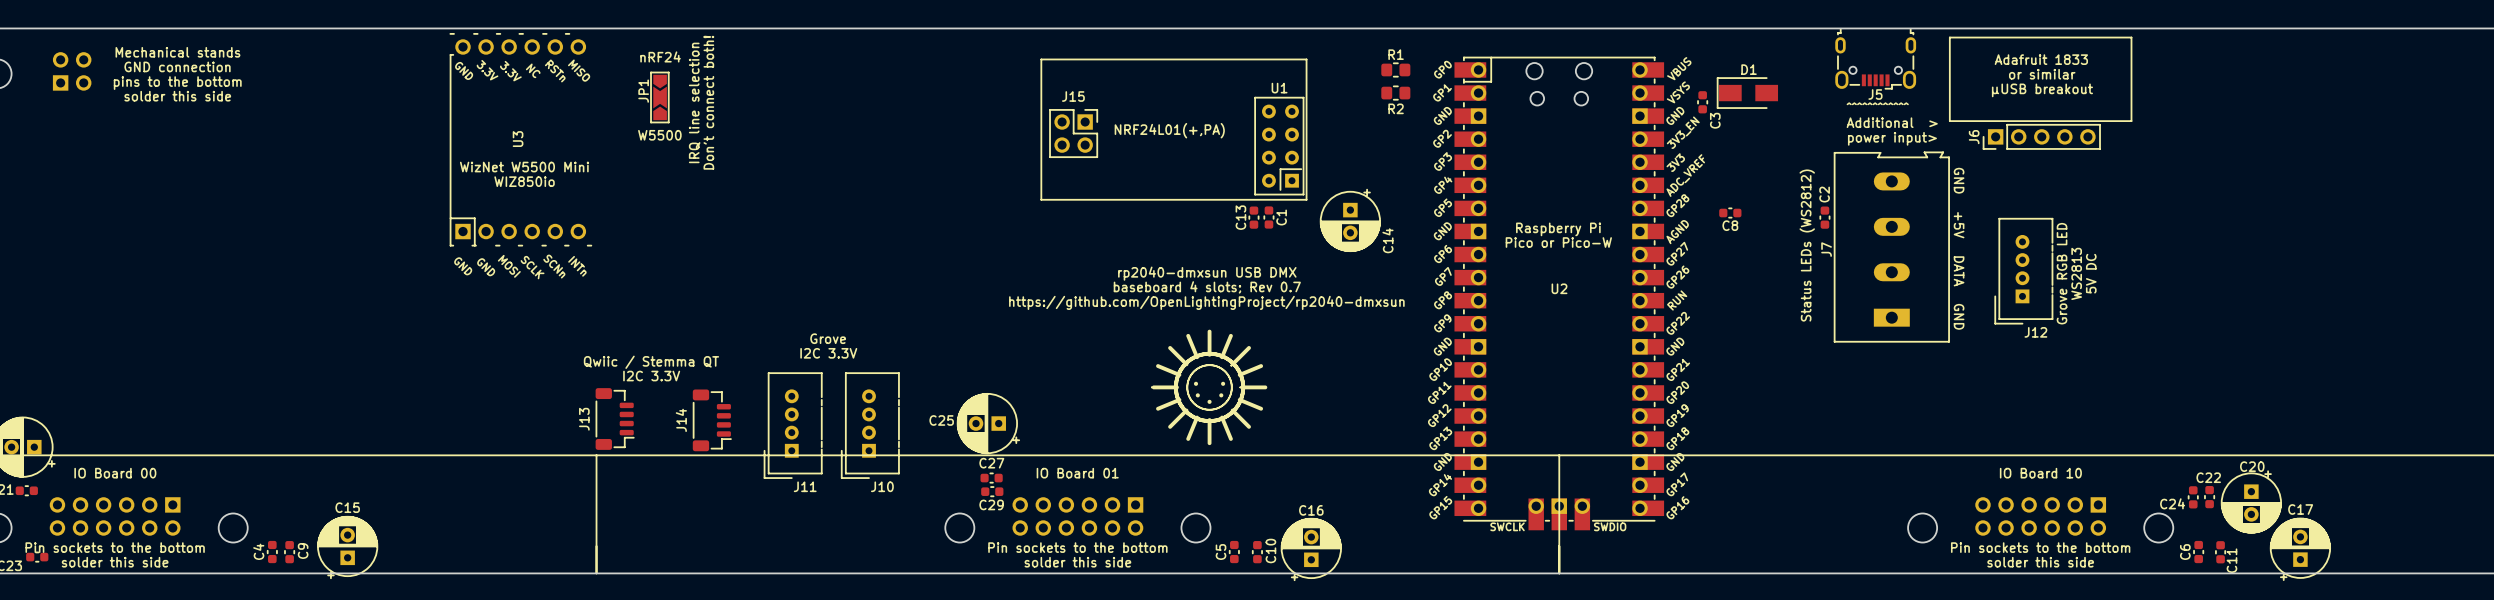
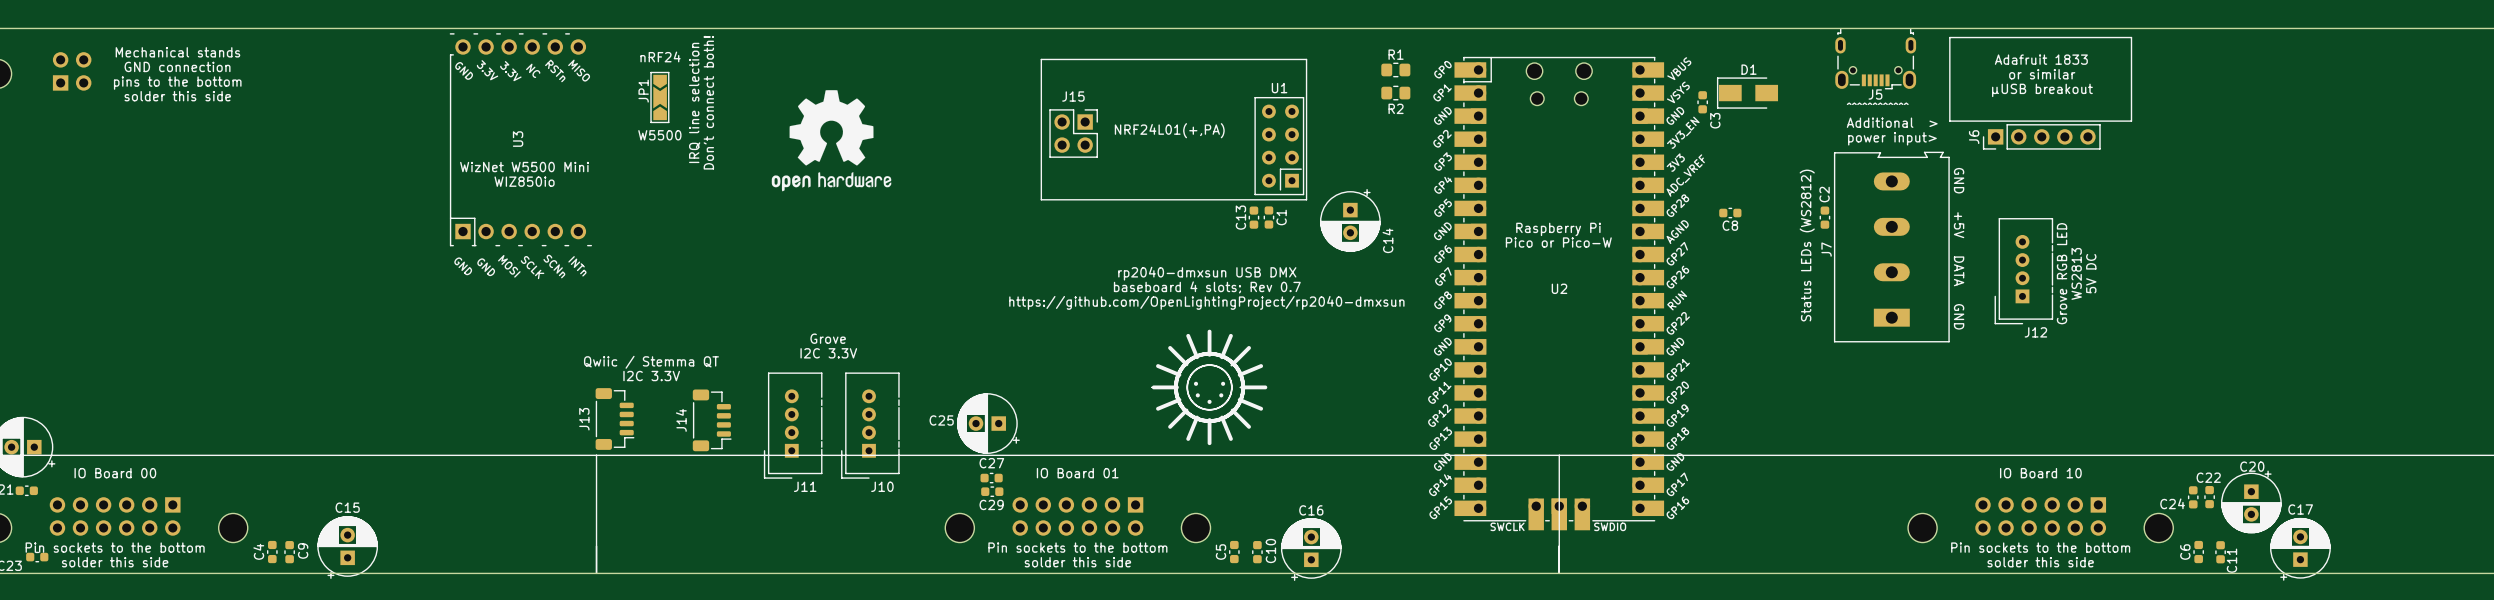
drawing: none -> [771, 90, 892, 192]

